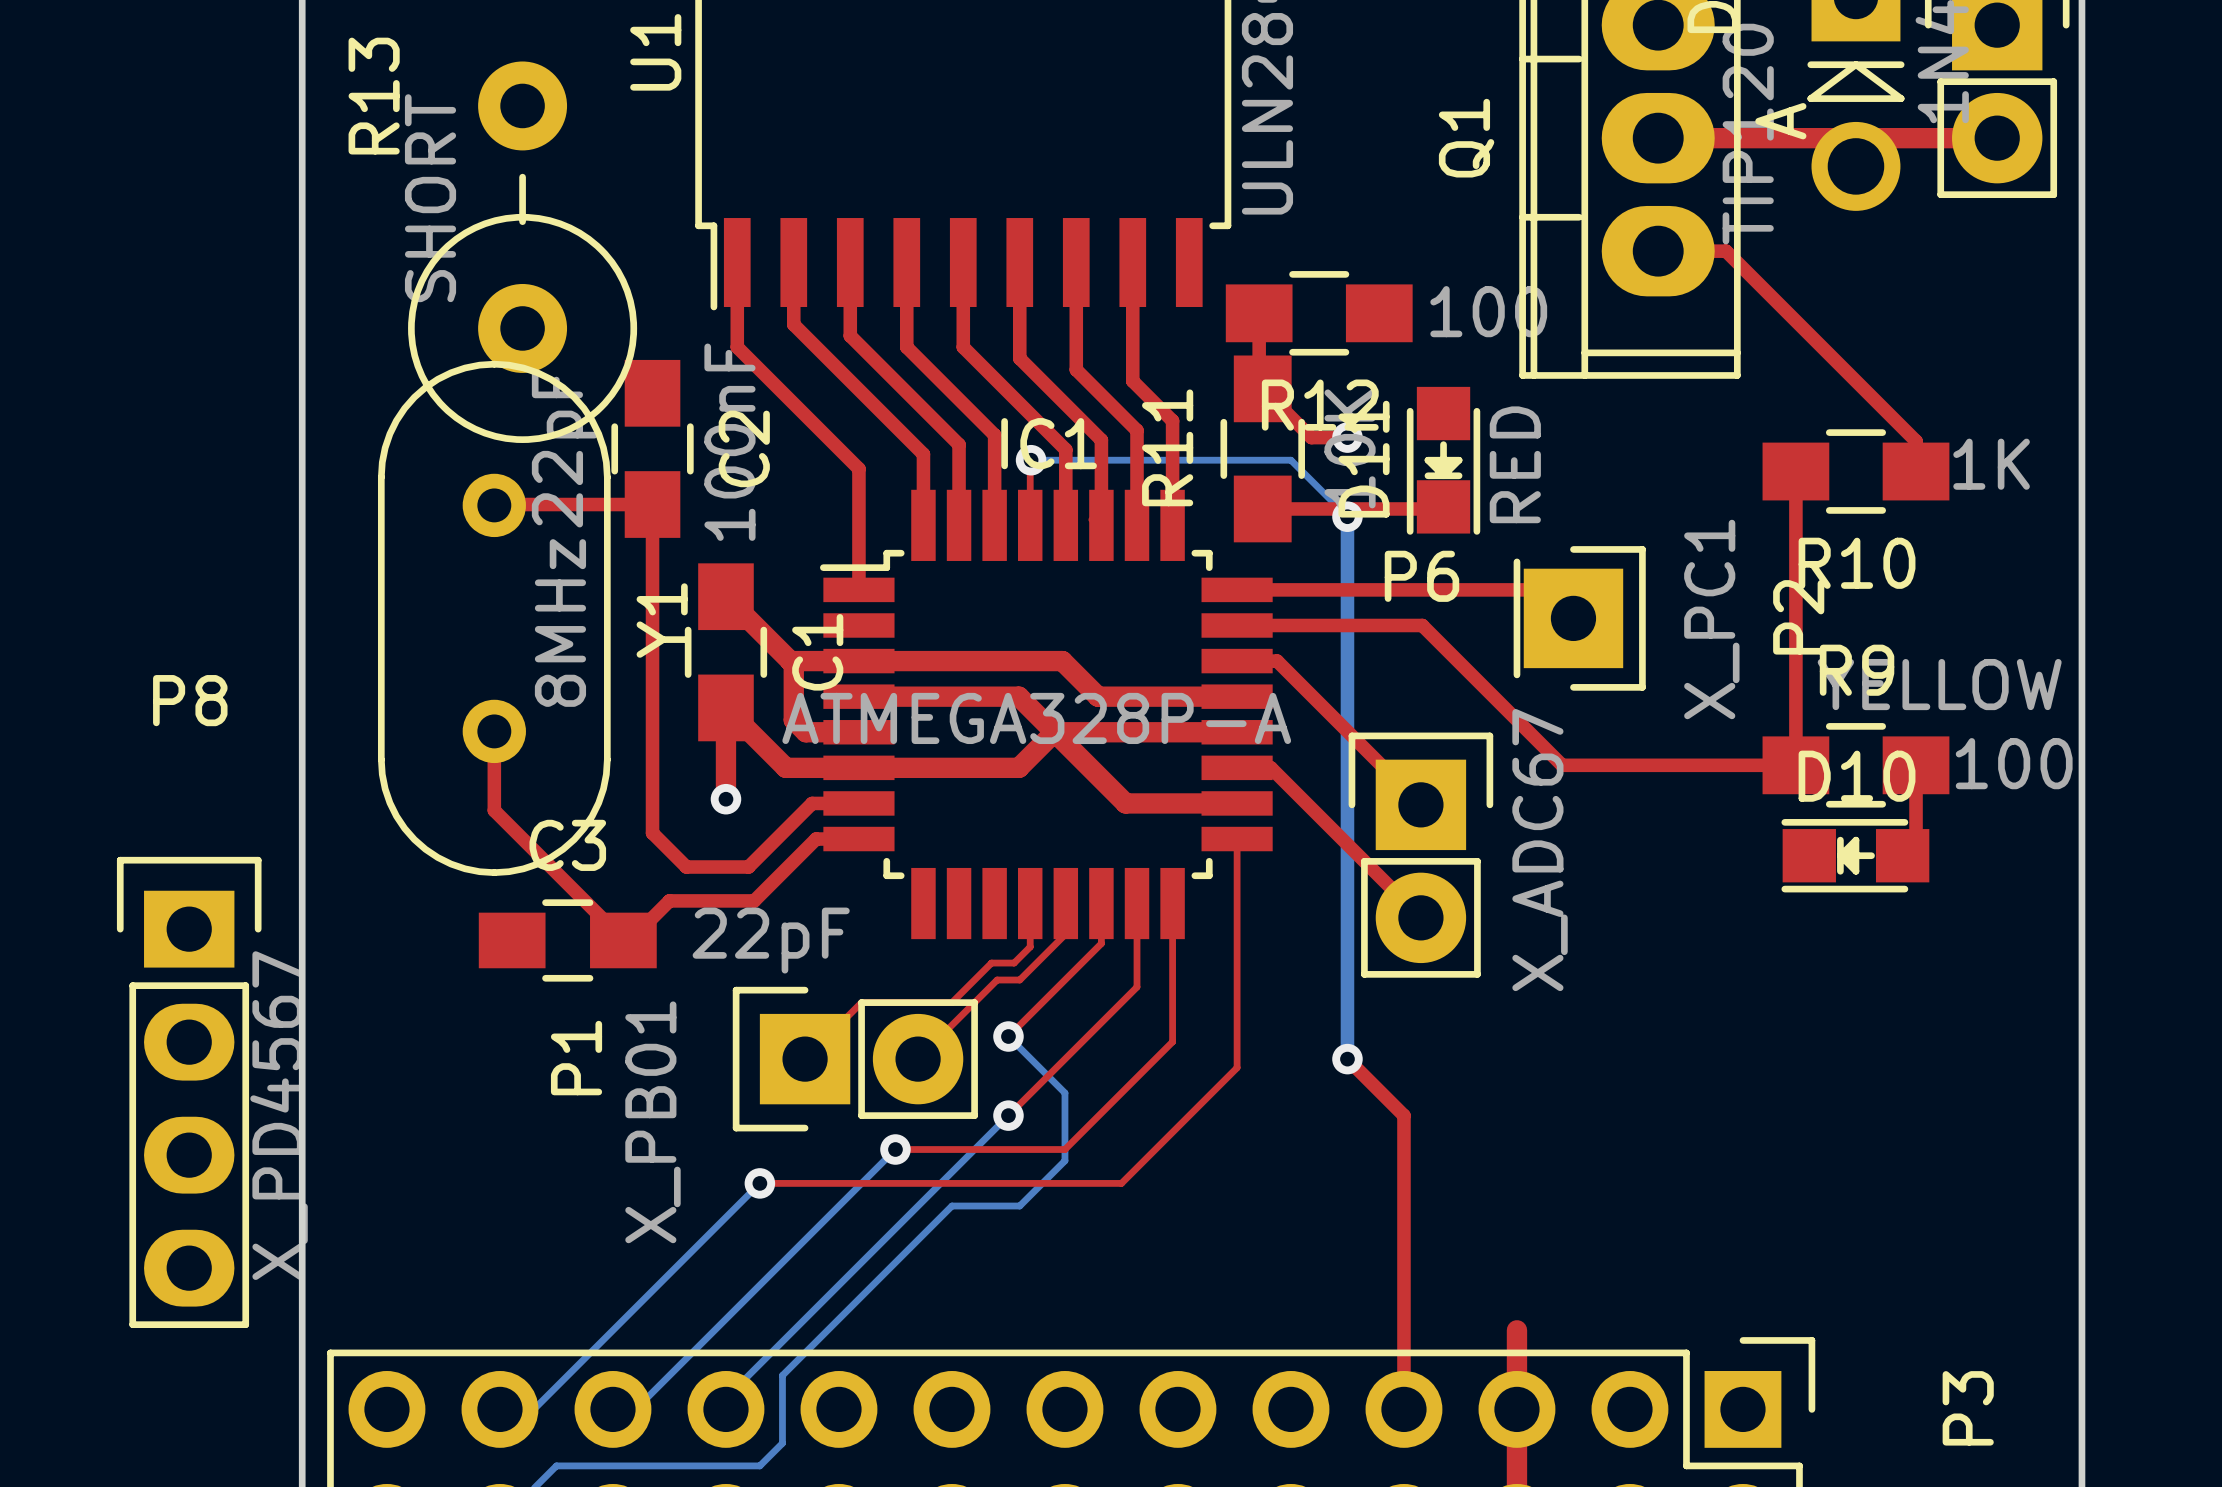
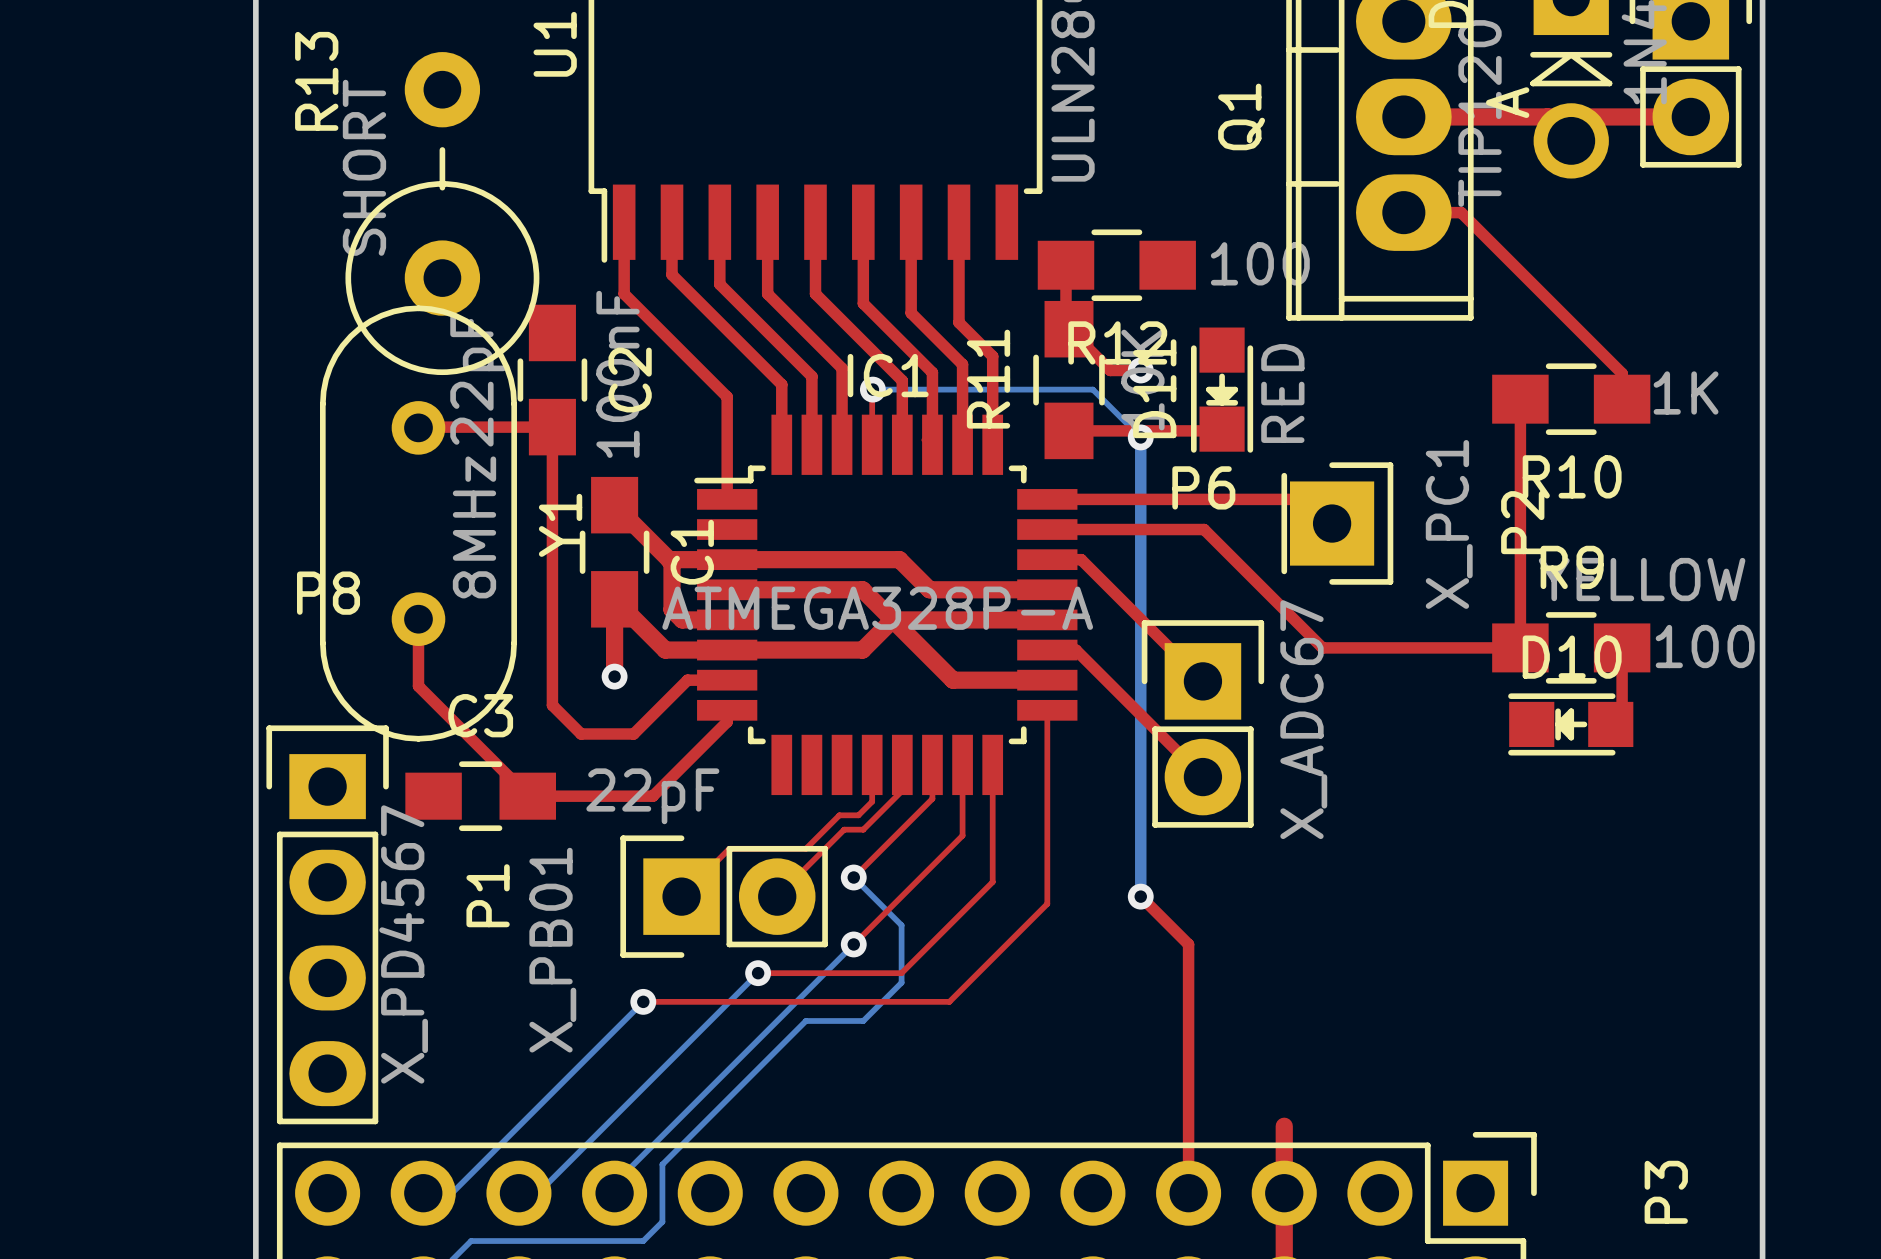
top track: (858, 839) (816, 839) (754, 900) (669, 900) (629, 940) -> (727, 710) (727, 721) (652, 796) (533, 796)
P8 position: (189, 1092) -> (327, 924)

